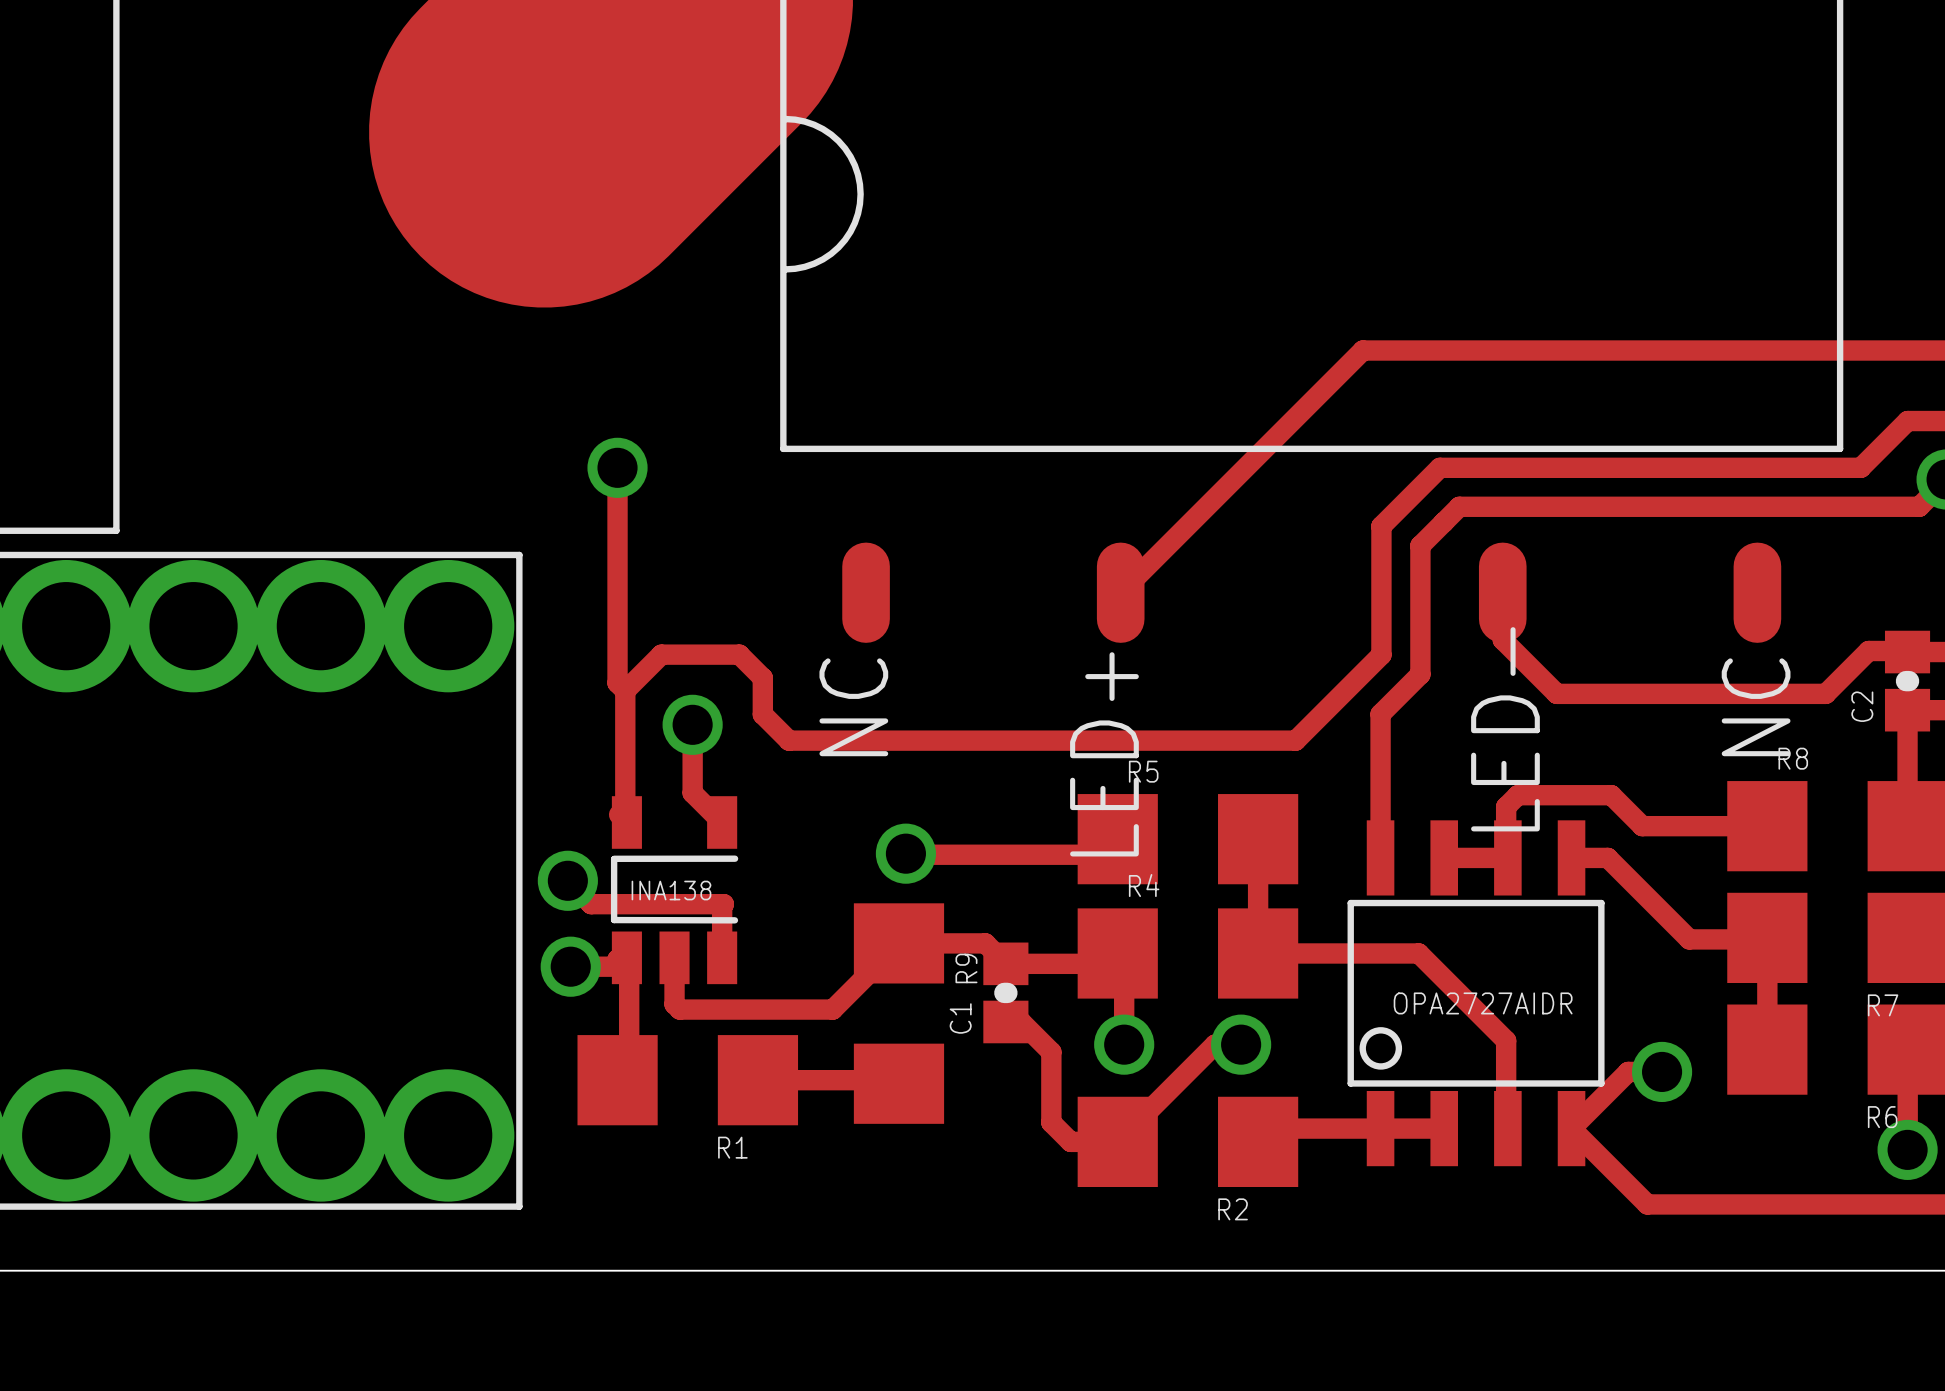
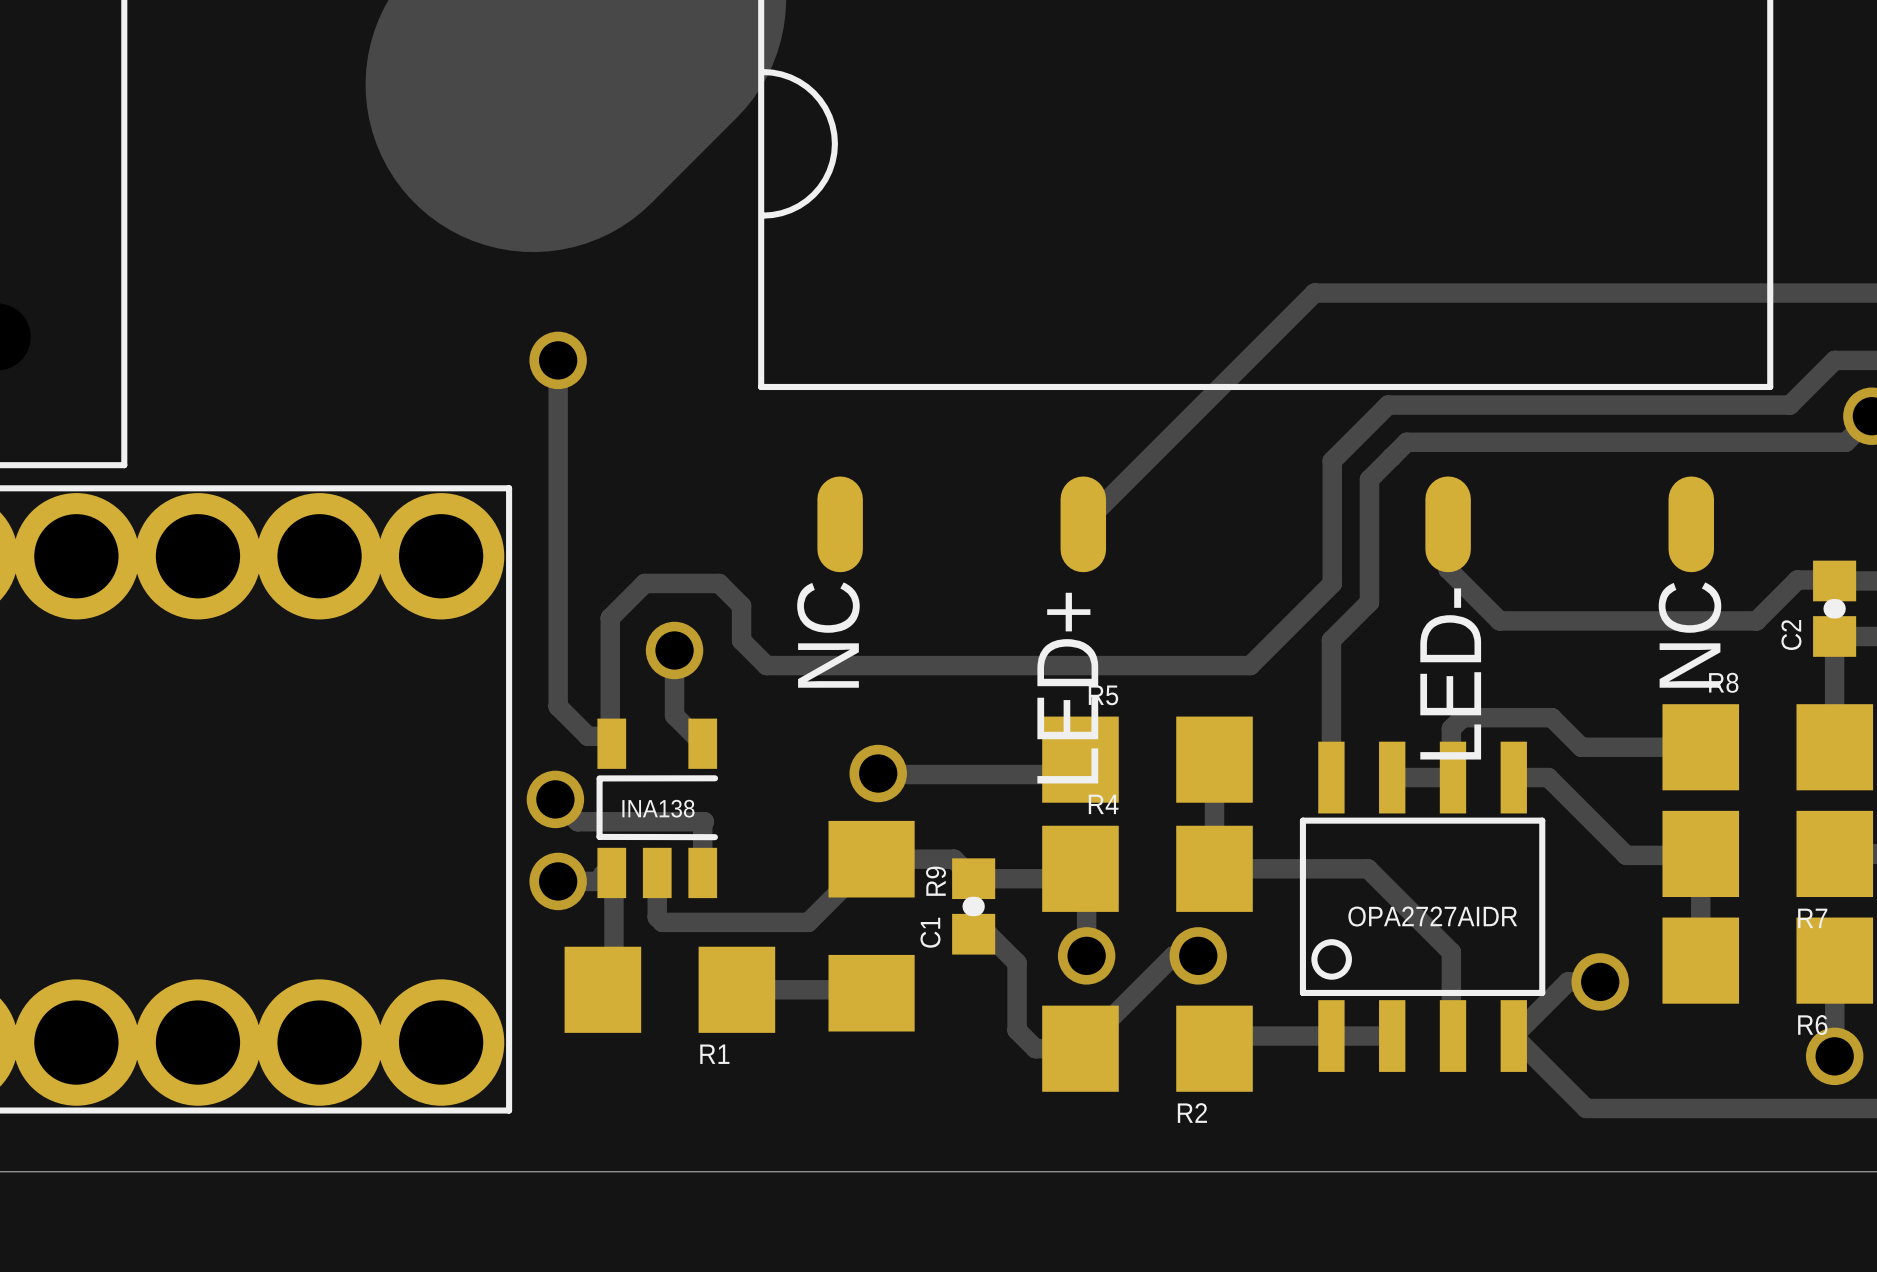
track: none -> (558, 360) (558, 706) (587, 736) (604, 736)
track: (617, 467) (617, 683) (625, 690) -> none
via position: (617, 467) -> (558, 360)

